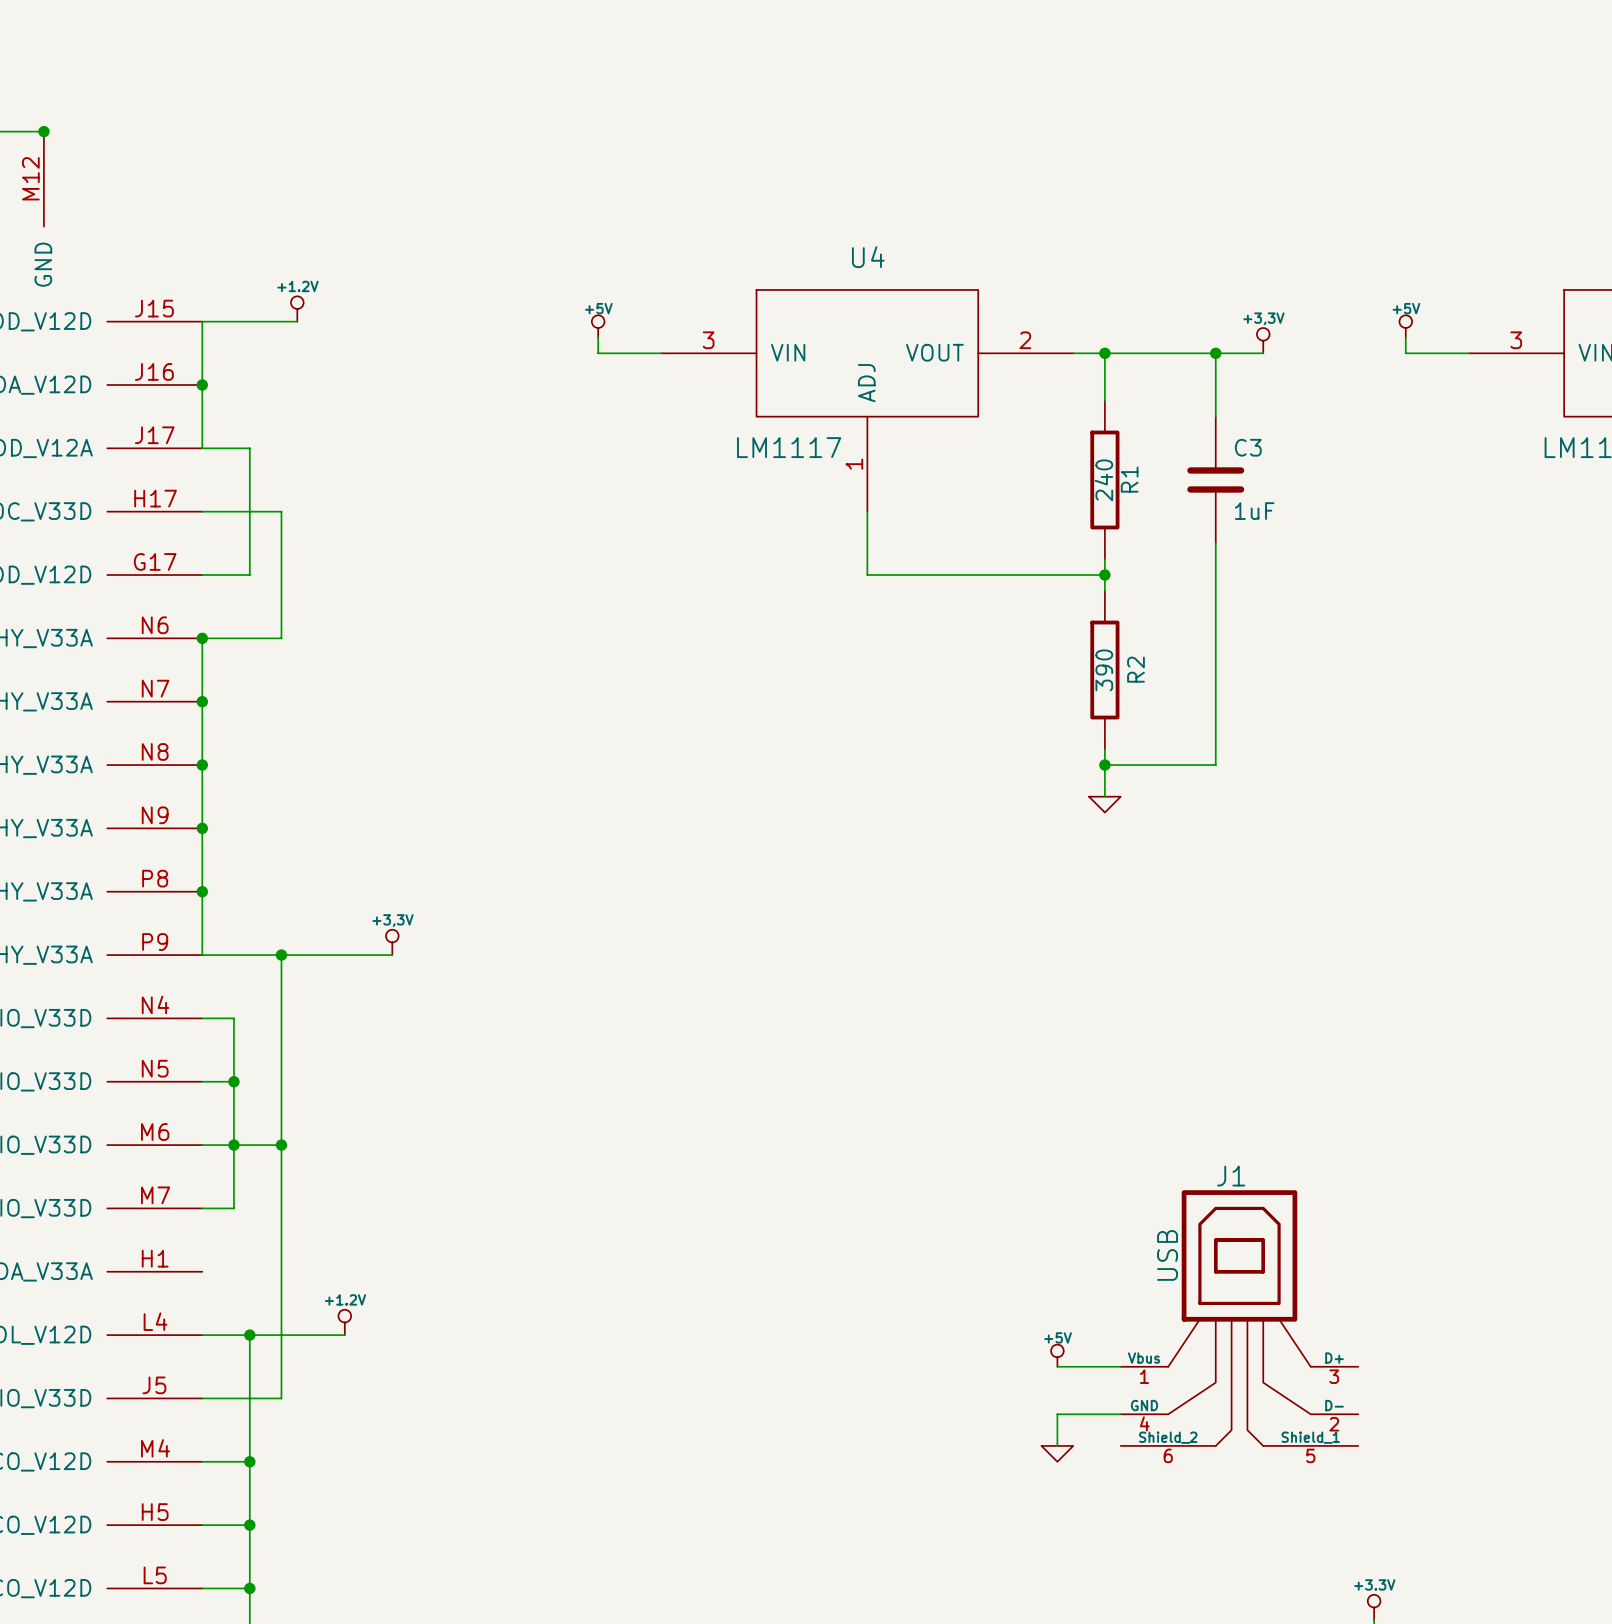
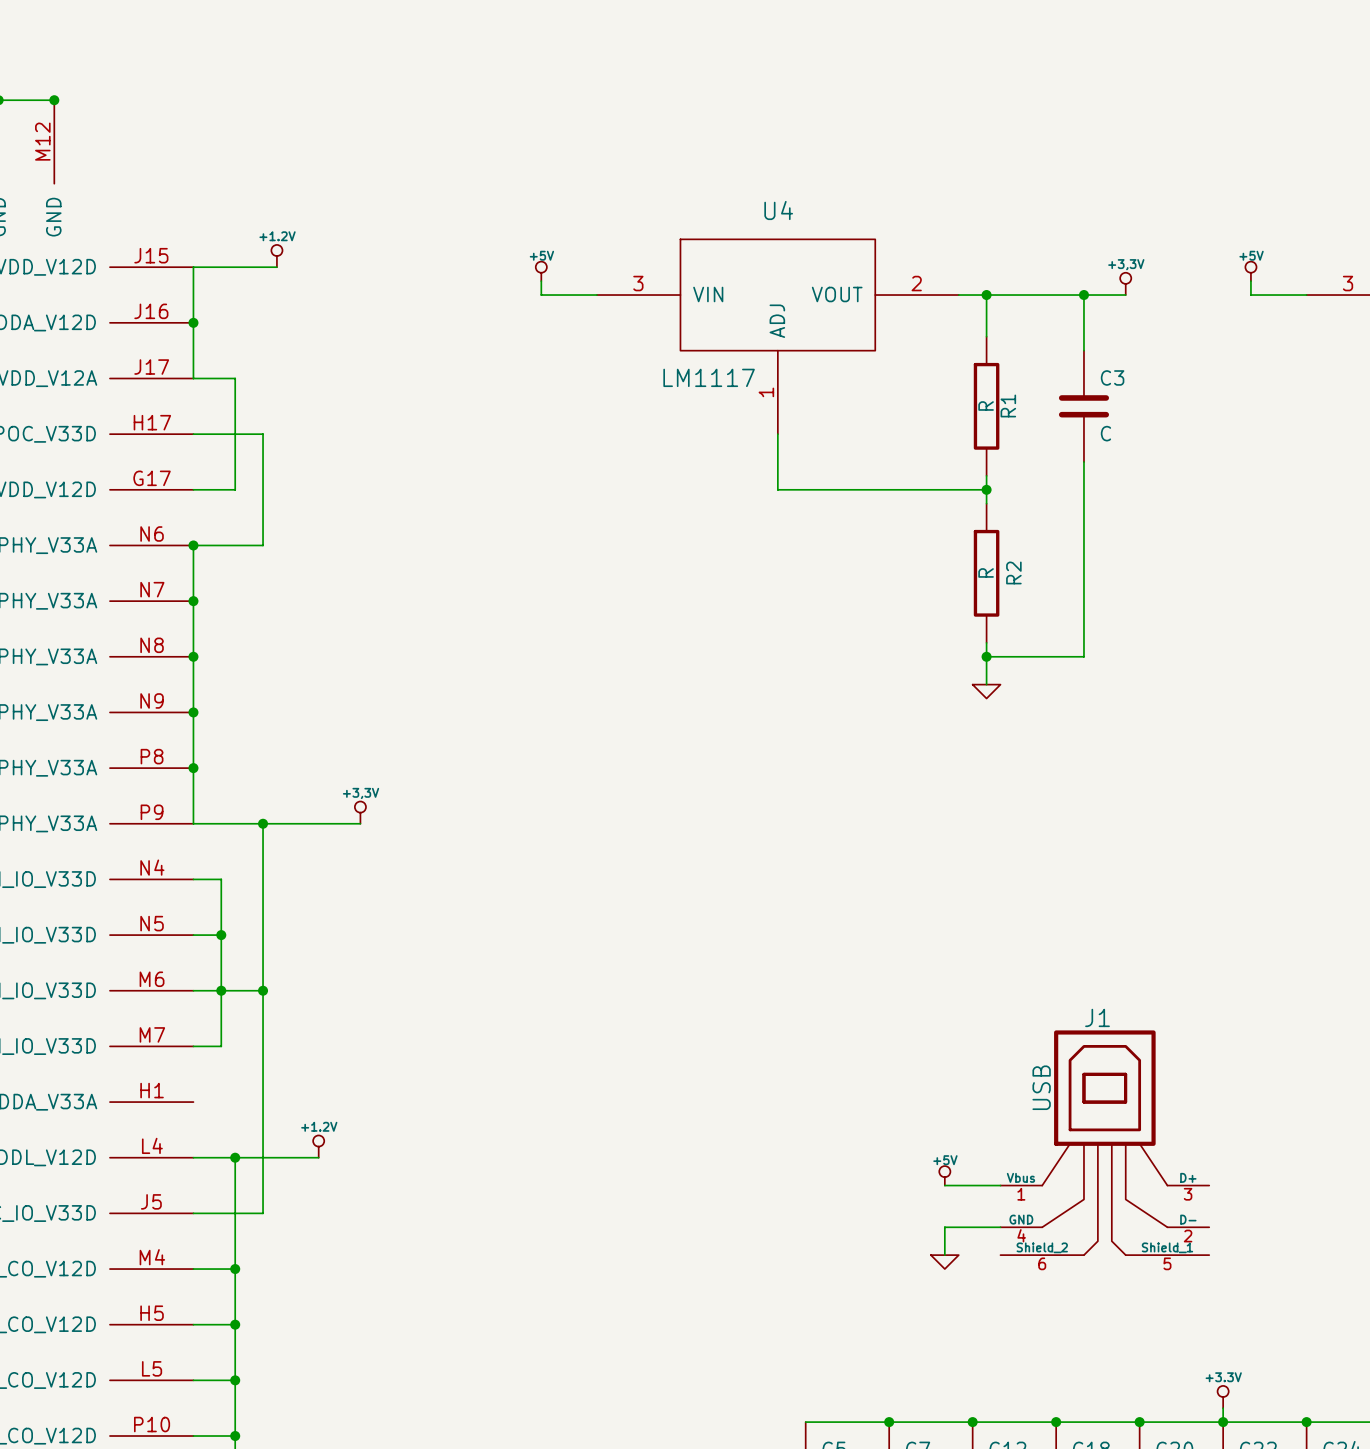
R1 value: 240 (1103, 480) -> R (986, 405)
C3 value: 1uF (1254, 511) -> C (1105, 433)
R2 value: 390 (1104, 670) -> R (986, 572)

